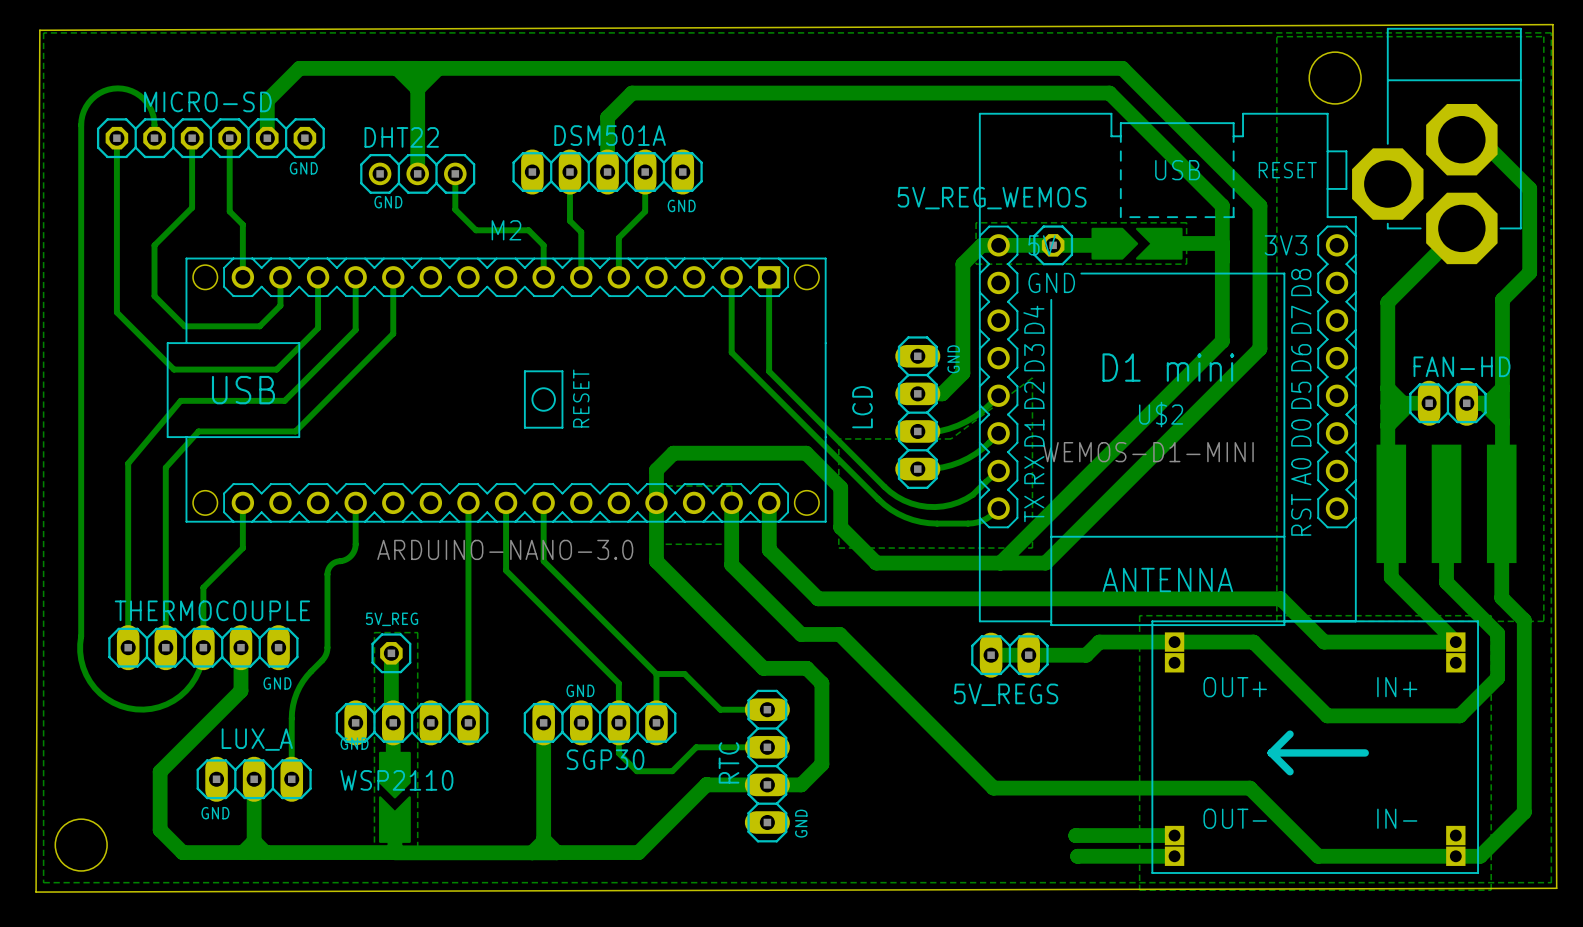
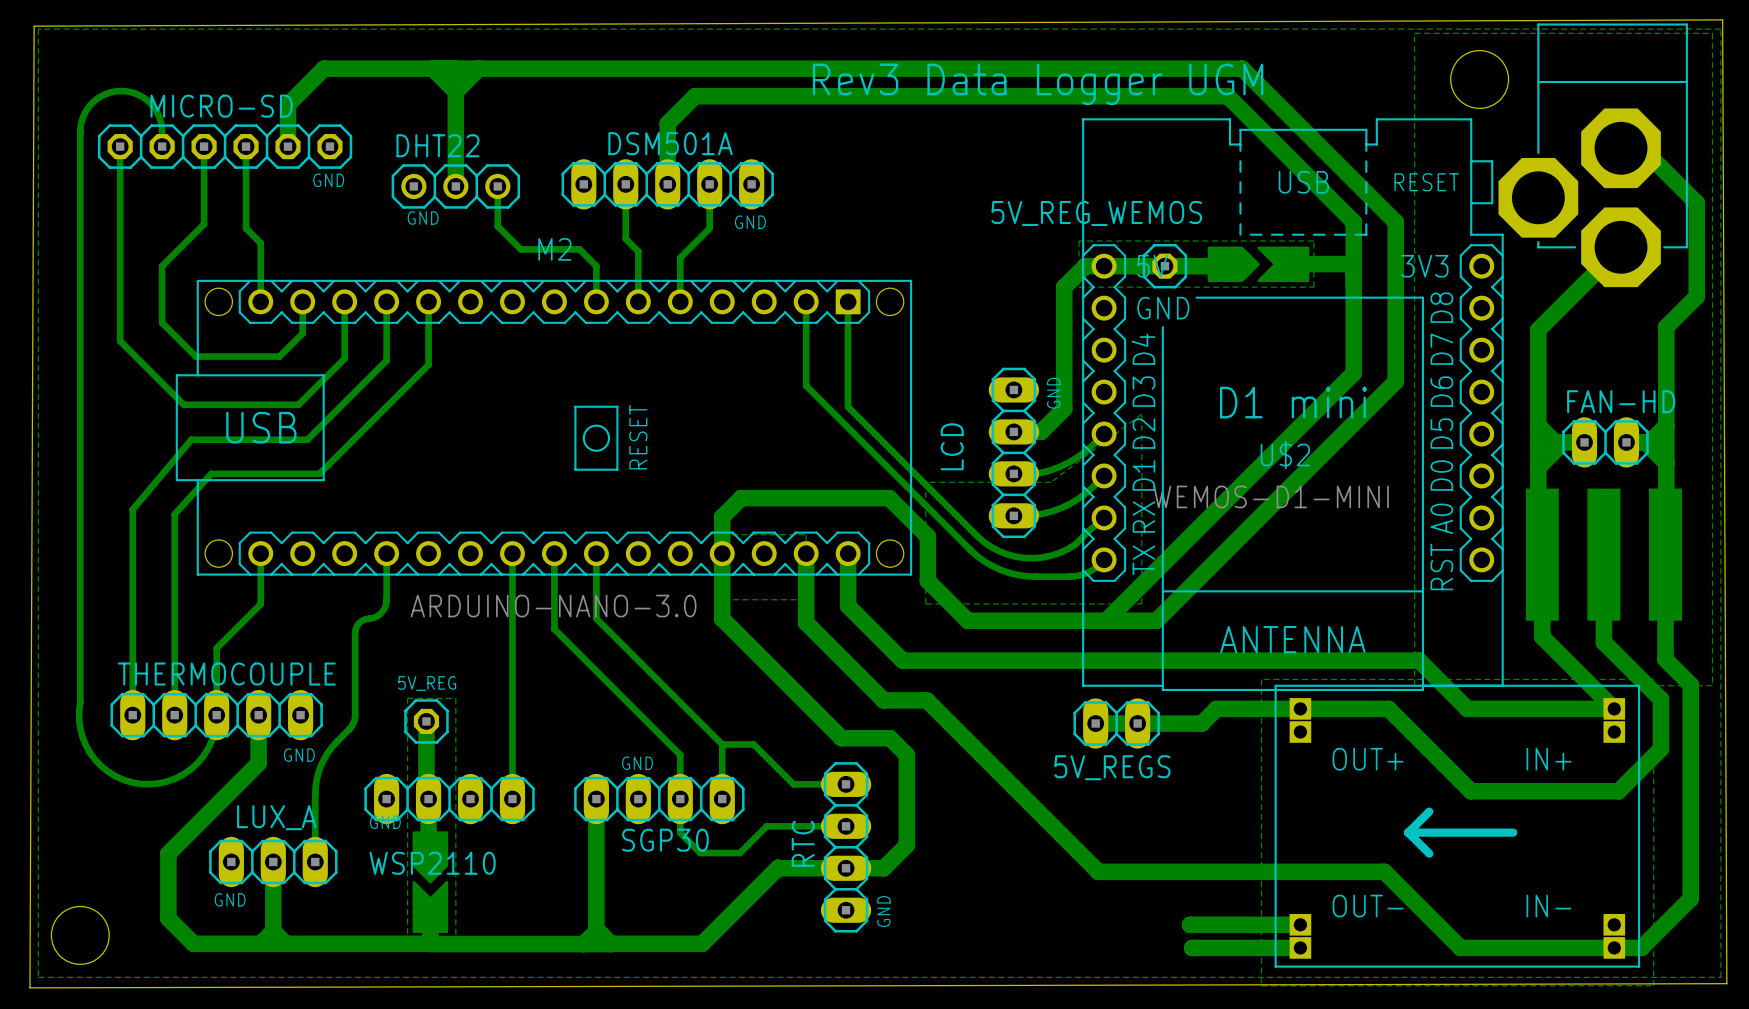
text: none -> Rev3 Data Logger UGM (1038, 84)

